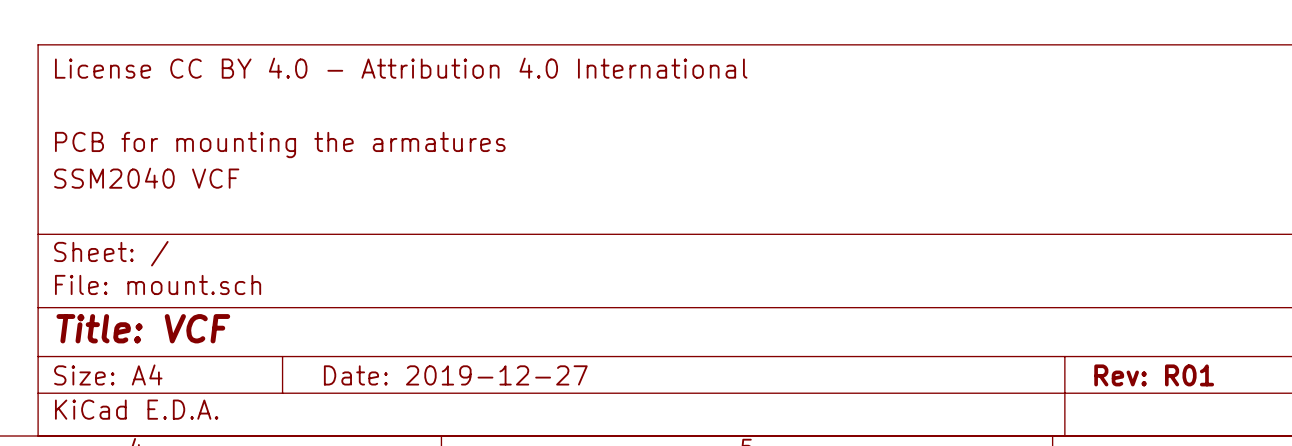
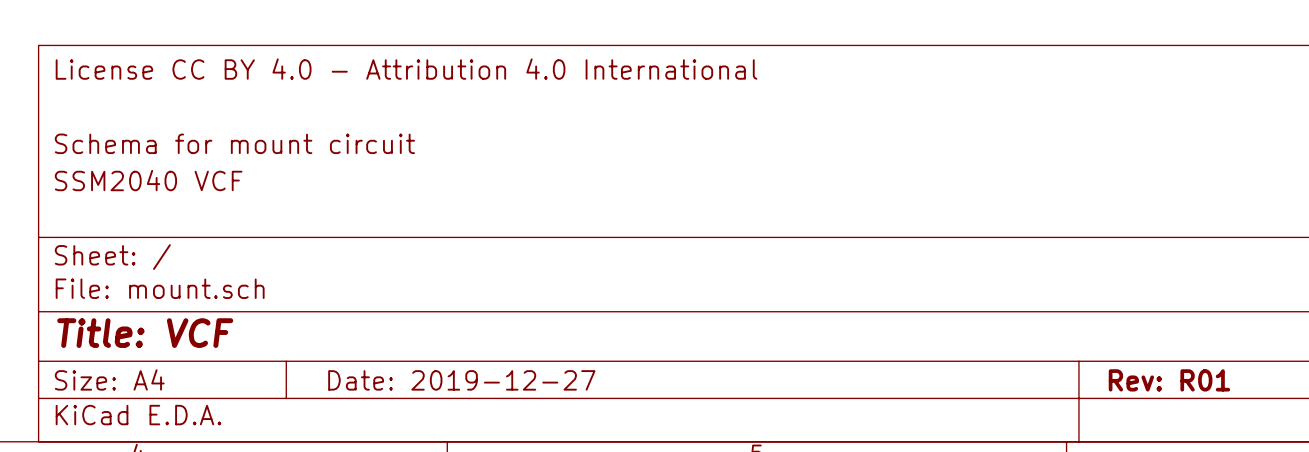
title block: PCB for mounting the armatures (280, 145) -> Schema for mount circuit (234, 143)

